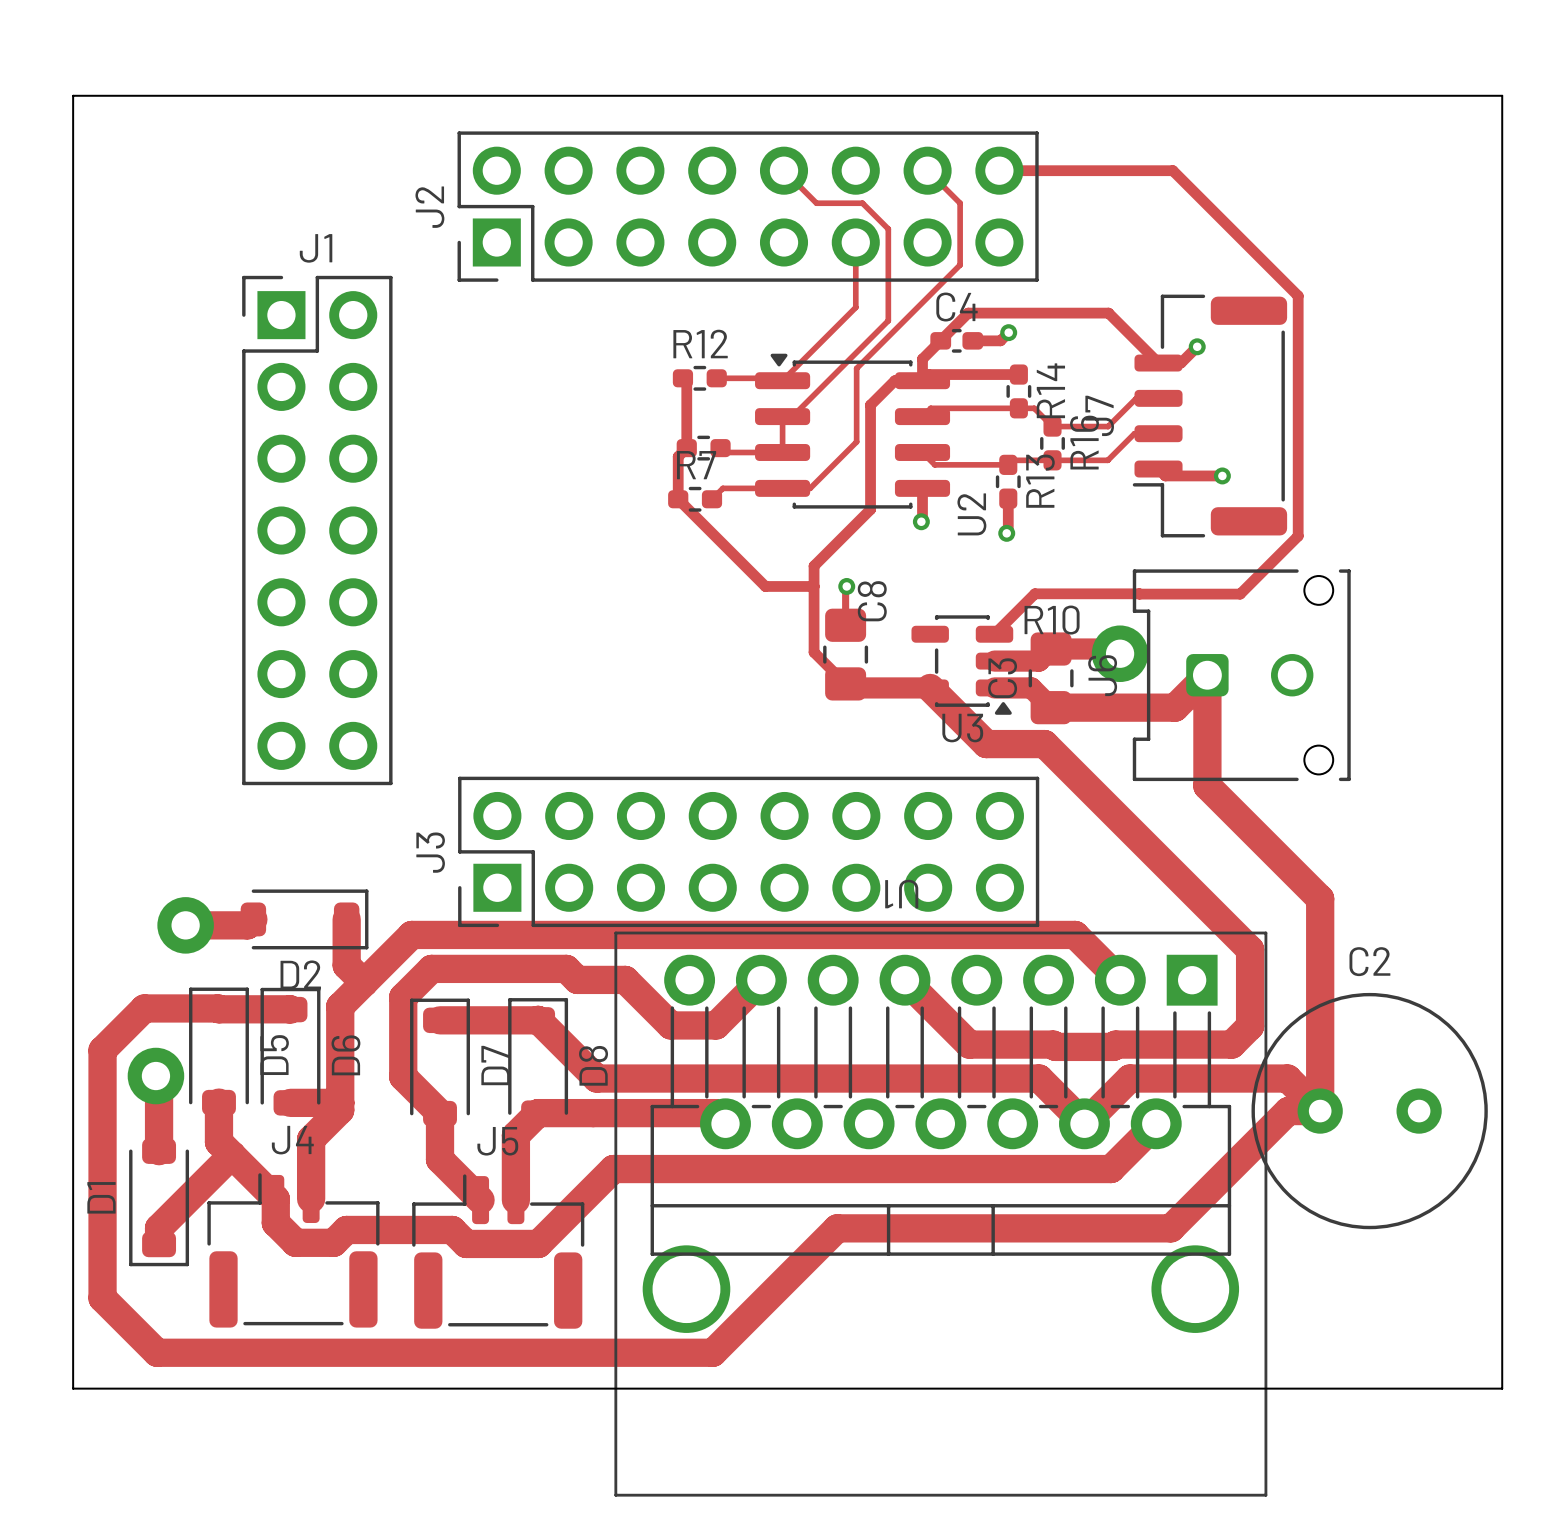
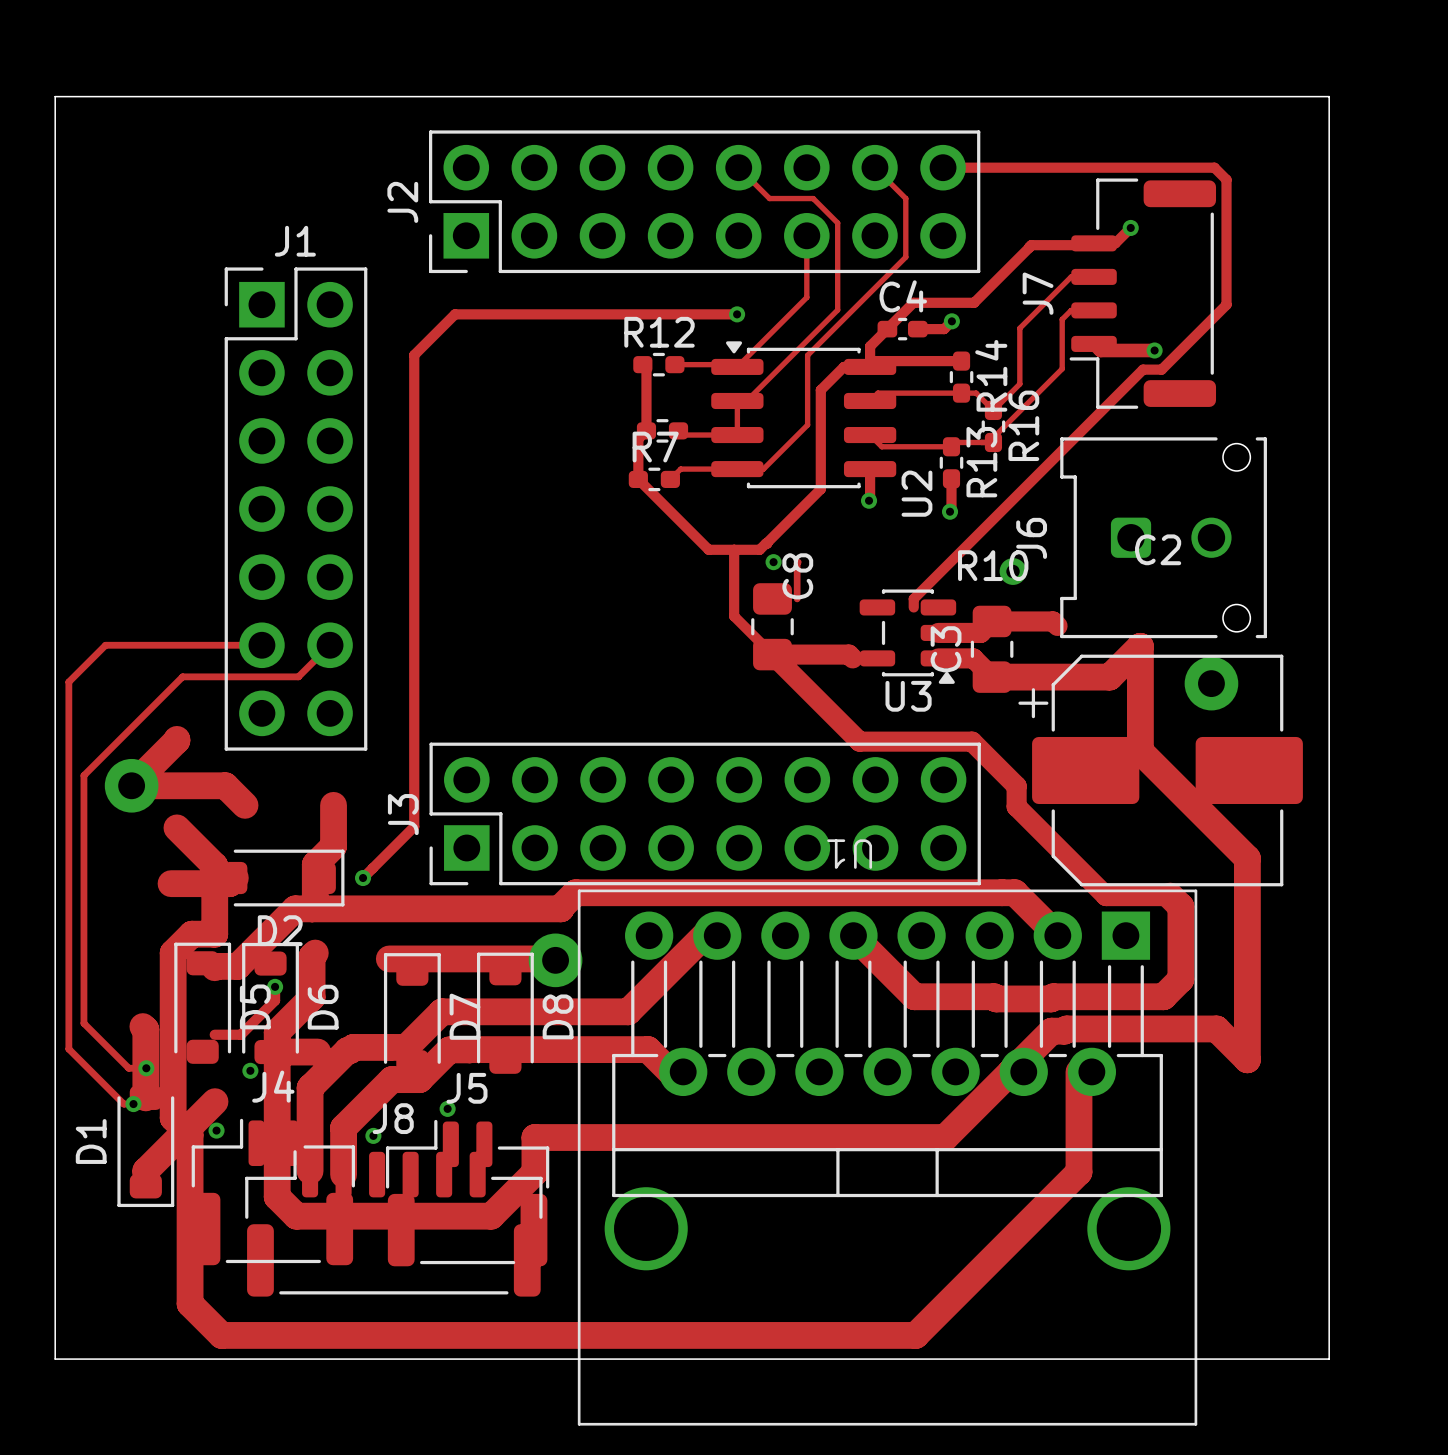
board edge: (73, 95) (73, 1388) (1502, 1388) (1502, 95) (1406, 95) -> (64, 96) (55, 96) (55, 1359) (1329, 1359) (1329, 96)
track: (1172, 170) (1298, 295) -> (1107, 167) (1214, 167) (1226, 179) (1226, 286)
track: none -> (1130, 227) (1115, 243) (1031, 245) (1029, 247)
via: none -> (1130, 227)
track: (1032, 313) (1108, 313) (1158, 363) (1180, 363) (1197, 346) -> (974, 302) (1029, 247)
track: (1298, 315) (1298, 536) (1240, 594) (1139, 594) -> (1226, 304) (1161, 369) (1143, 369) (913, 598) (913, 607)
track: none -> (1094, 310) (1071, 310) (1062, 319) (1062, 368) (988, 442)
track: none -> (737, 314) (455, 314) (414, 355) (414, 826) (363, 878)
via: none -> (737, 314)
via position: (1197, 346) -> (1154, 350)
track: (1158, 398) (1136, 398) (1108, 426) (1052, 426) -> (1094, 276) (1071, 276) (1019, 328) (1019, 384) (993, 410)
J7 position: (1209, 416) -> (1142, 293)
track: (1158, 433) (1134, 433) (1107, 460) (1052, 460) -> none
track: (1158, 469) (1165, 475) (1222, 475) -> (1094, 343) (1100, 350) (1154, 350)
via: (1222, 475) -> none
track: (814, 566) (814, 652) (849, 687) (930, 687) (986, 744) (1044, 744) (1239, 938) -> (772, 654) (859, 741) (972, 741) (1016, 786) (1016, 806) (1106, 896) (1170, 896)
track: (752, 573) (765, 586) (814, 586) -> (708, 549) (759, 549) (767, 543)
track: none -> (734, 549) (734, 616) (772, 654)
via position: (846, 586) -> (773, 562)
track: (1139, 593) (1034, 593) (994, 634) -> none
via: none -> (1013, 571)
R10 name position: R10 (1052, 620) -> R10 (993, 565)
via: (1120, 653) -> none
C8 position: (845, 654) -> (772, 626)
track: none -> (261, 645) (105, 645) (68, 682) (68, 1049) (123, 1104) (133, 1104)
track: none -> (330, 645) (298, 676) (182, 676) (83, 775) (83, 1023) (128, 1068) (146, 1068)
J6 position: (1241, 675) -> (1163, 537)
track: none -> (772, 654) (848, 654) (852, 658)
via: none -> (1211, 683)
track: none -> (176, 739) (131, 785) (225, 785) (245, 805)
track: none -> (333, 805) (333, 846) (315, 864) (315, 905) (312, 908)
track: none -> (176, 827) (214, 865) (214, 934) (191, 934) (173, 952) (173, 1117) (190, 1134) (190, 1303) (221, 1335) (915, 1335) (1078, 1172) (1078, 1071)
track: (346, 919) (346, 965) (363, 982) -> none
via: none -> (363, 878)
via position: (185, 925) -> (131, 785)
track: (612, 934) (411, 934) (340, 1006) (340, 1110) (311, 1139) (311, 1198) -> (575, 892) (560, 908) (295, 908) (237, 966) (214, 967)
C2 name position: C2 (1369, 961) -> C2 (1158, 549)
track: none -> (704, 935) (628, 1011) (441, 1011) (406, 1047) (353, 1047) (347, 1050) (310, 1087) (310, 1171)
track: (761, 980) (716, 1025) (670, 1025) (625, 979) (577, 979) (566, 968) (431, 968) (403, 997) (403, 1076) (440, 1113) (440, 1159) (480, 1200) -> none
C2 footprint: [1251, 992, 1488, 1230] -> [1018, 654, 1303, 887]
track: none -> (389, 958) (555, 960)
via: none -> (555, 960)
track: (290, 1009) (144, 1008) (102, 1050) (102, 1298) (157, 1352) (712, 1352) (837, 1228) (1170, 1228) (1288, 1111) (1320, 1111) -> none
track: (440, 1020) (538, 1019) (596, 1078) (1039, 1078) (1084, 1123) (1127, 1080) -> (315, 953) (312, 956) (312, 997) (277, 1032) (277, 1196) (296, 1216) (491, 1216) (534, 1172) (534, 1137) (945, 1137) (1051, 1031) (1064, 1031)
track: none -> (275, 986) (275, 1000) (240, 1034) (214, 1034)
via: none -> (275, 986)
via: (155, 1076) -> none
track: none -> (470, 1049) (648, 1049) (670, 1071)
track: none -> (469, 1049) (449, 1049) (419, 1079) (391, 1079) (343, 1127) (343, 1174)
track: (218, 1102) (218, 1142) (275, 1198) (275, 1223) (295, 1242) (333, 1242) (346, 1229) (452, 1229) (466, 1243) (538, 1243) (613, 1169) (1111, 1169) (1156, 1123) -> none
via: none -> (146, 1068)
via: none -> (250, 1070)
track: (725, 1123) (714, 1113) (538, 1113) (515, 1135) (515, 1200) -> none
via: none -> (133, 1104)
via: none -> (447, 1108)
via: none -> (216, 1130)
via: none -> (373, 1135)
J8: none -> (393, 1223)

